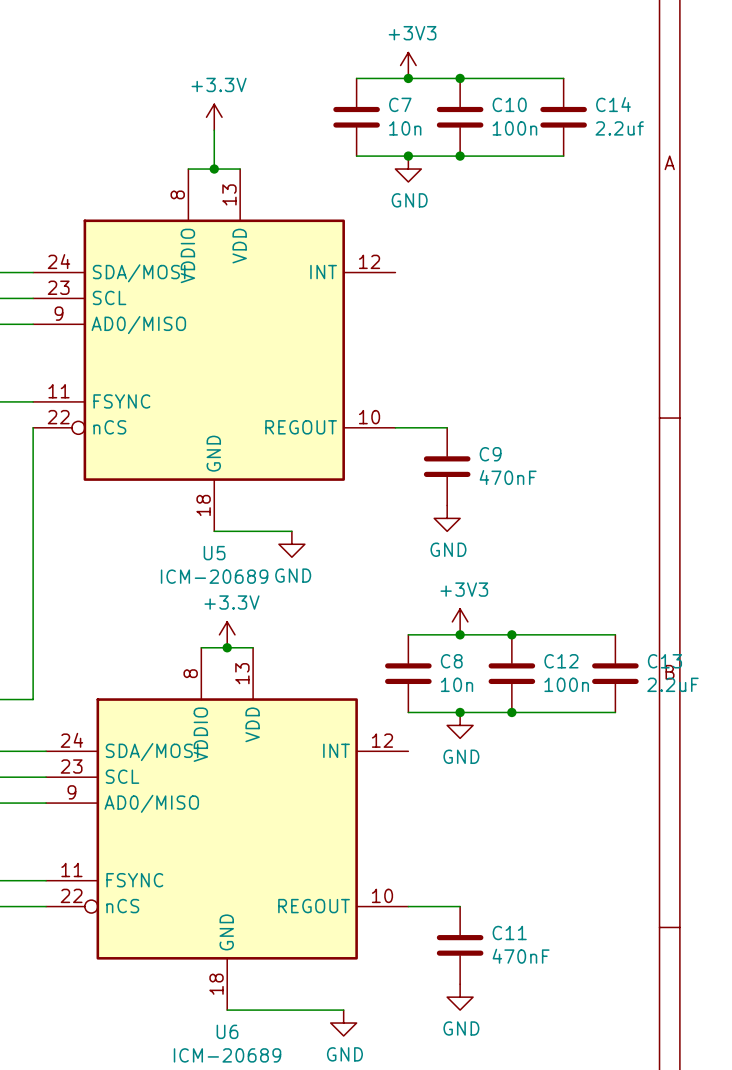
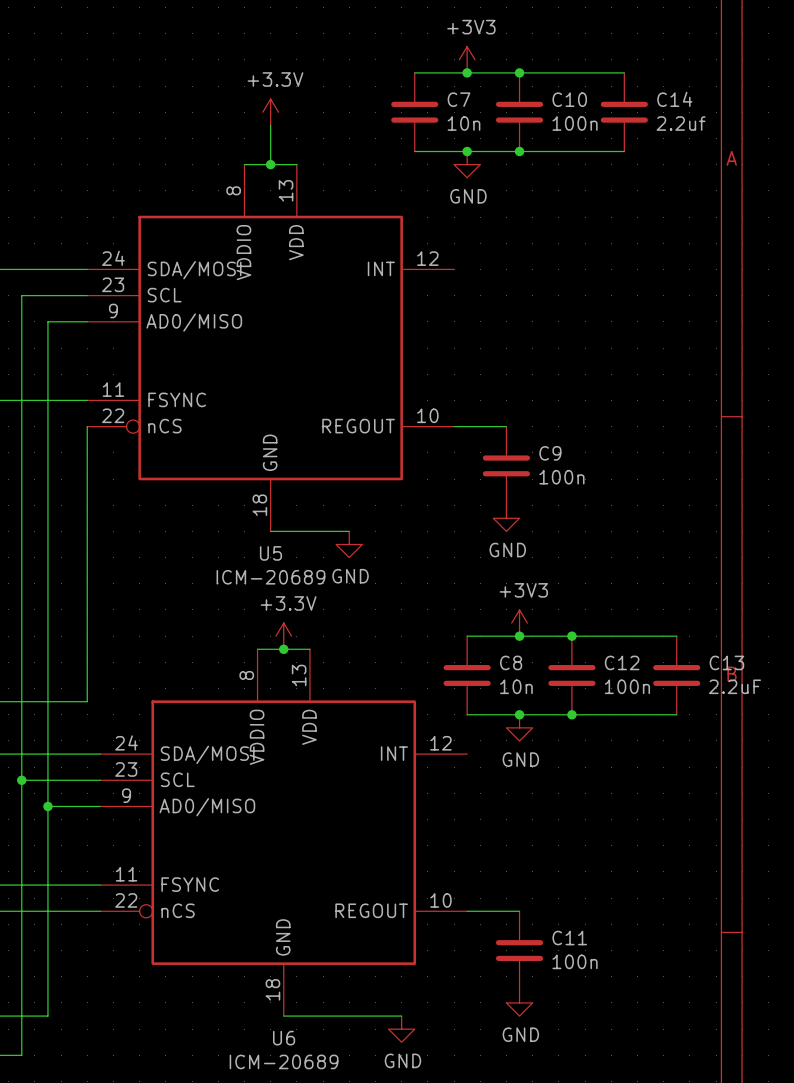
C9 value: 470nF (508, 477) -> 100n (561, 477)
C11 value: 470nF (521, 956) -> 100n (575, 961)

